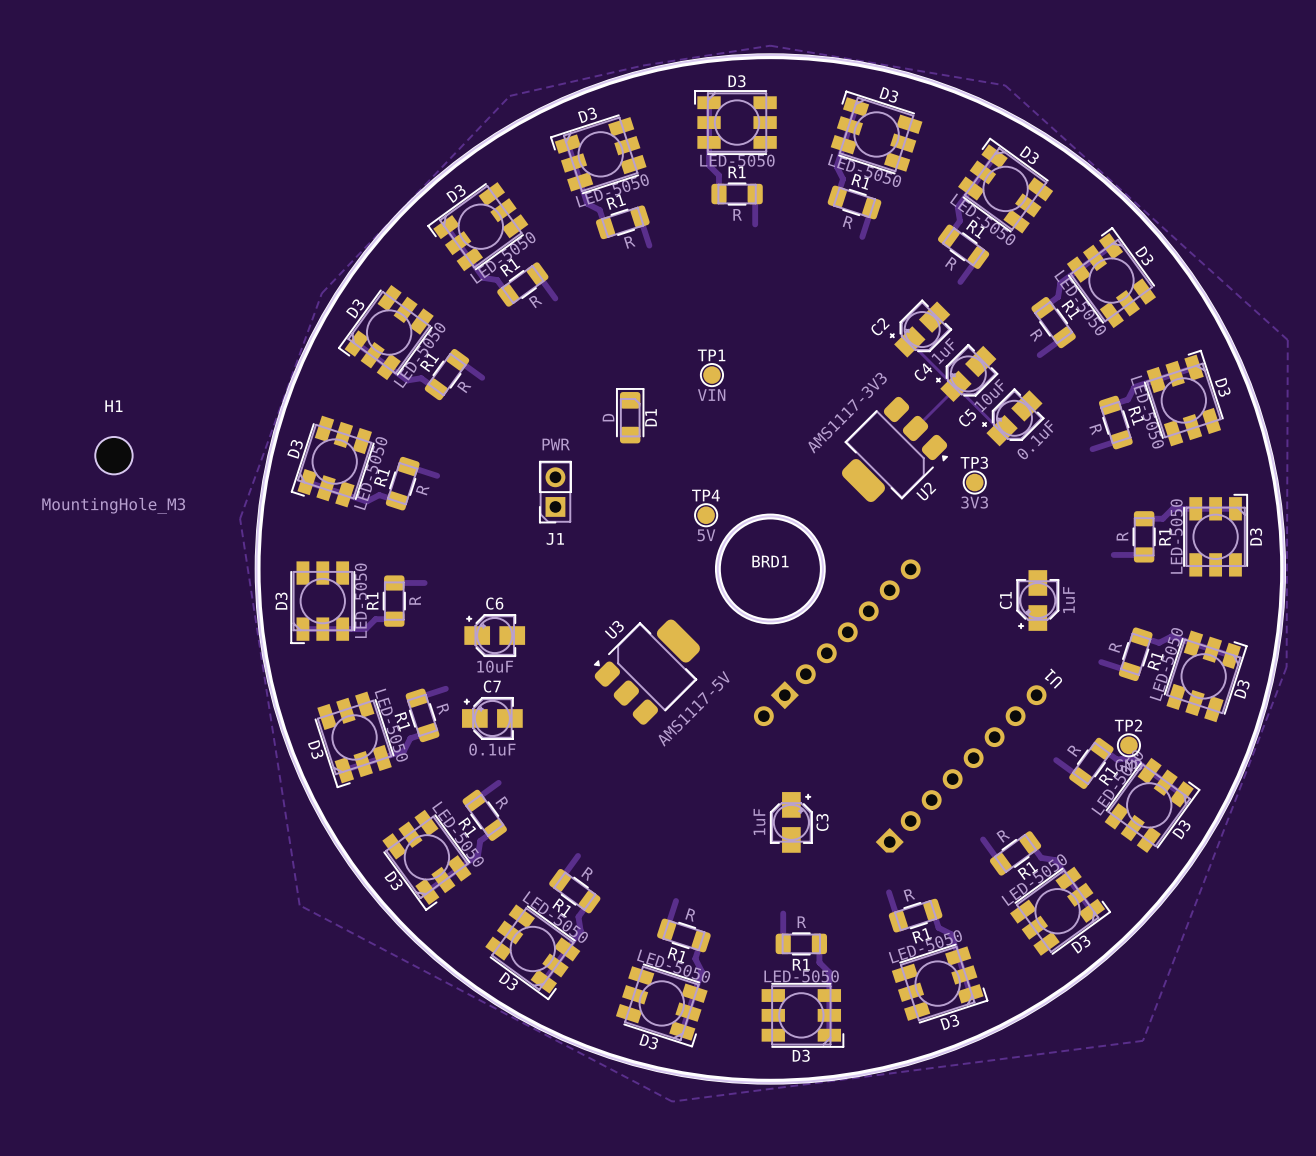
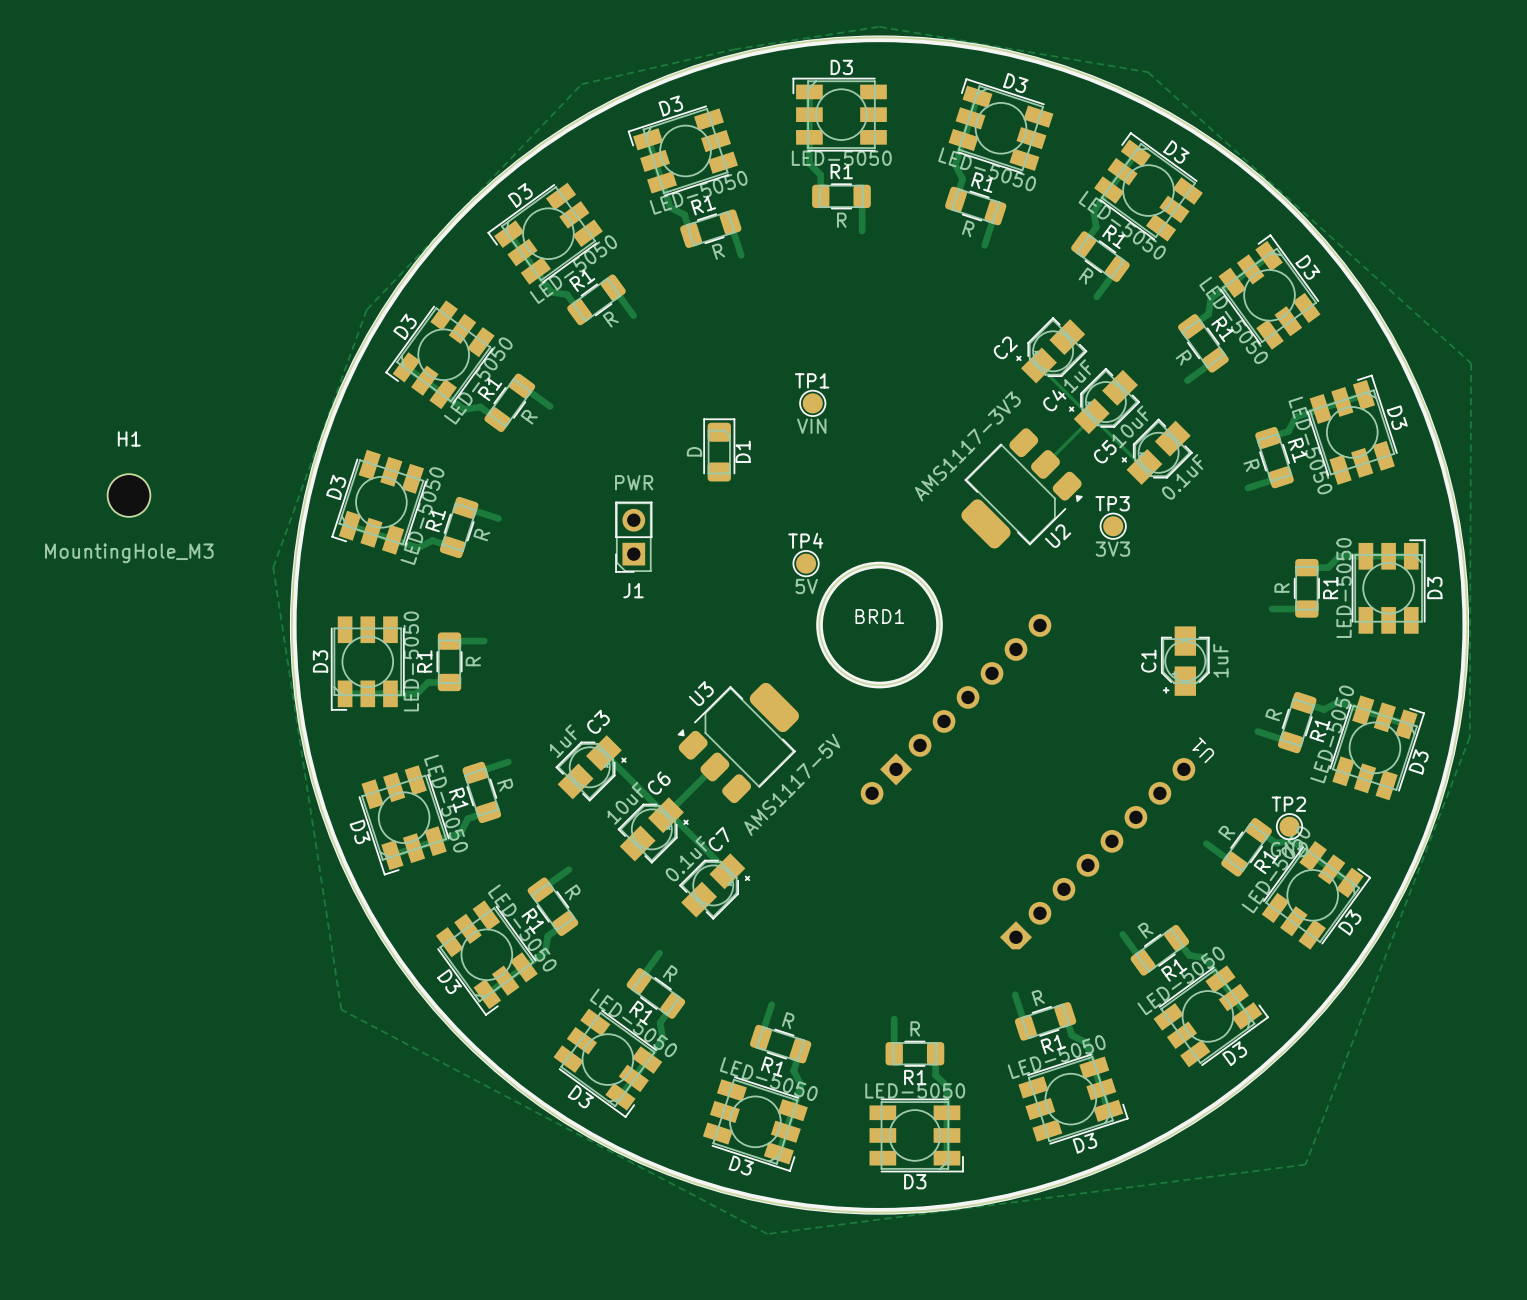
C6 rotation: 0° (494, 635) -> 135° clockwise (653, 830)
C6 position: (494, 635) -> (653, 830)
track: none -> (603, 753) (665, 815)
track: none -> (714, 766) (665, 815)
C7 rotation: 0° (492, 718) -> 135° clockwise (714, 886)
C7 position: (492, 718) -> (714, 886)
track: none -> (665, 815) (671, 815) (727, 871)
C3 rotation: 0° (791, 822) -> 45° clockwise (591, 768)
C3 position: (791, 822) -> (591, 768)
C3 name position: C3 (822, 822) -> C3 (598, 721)

